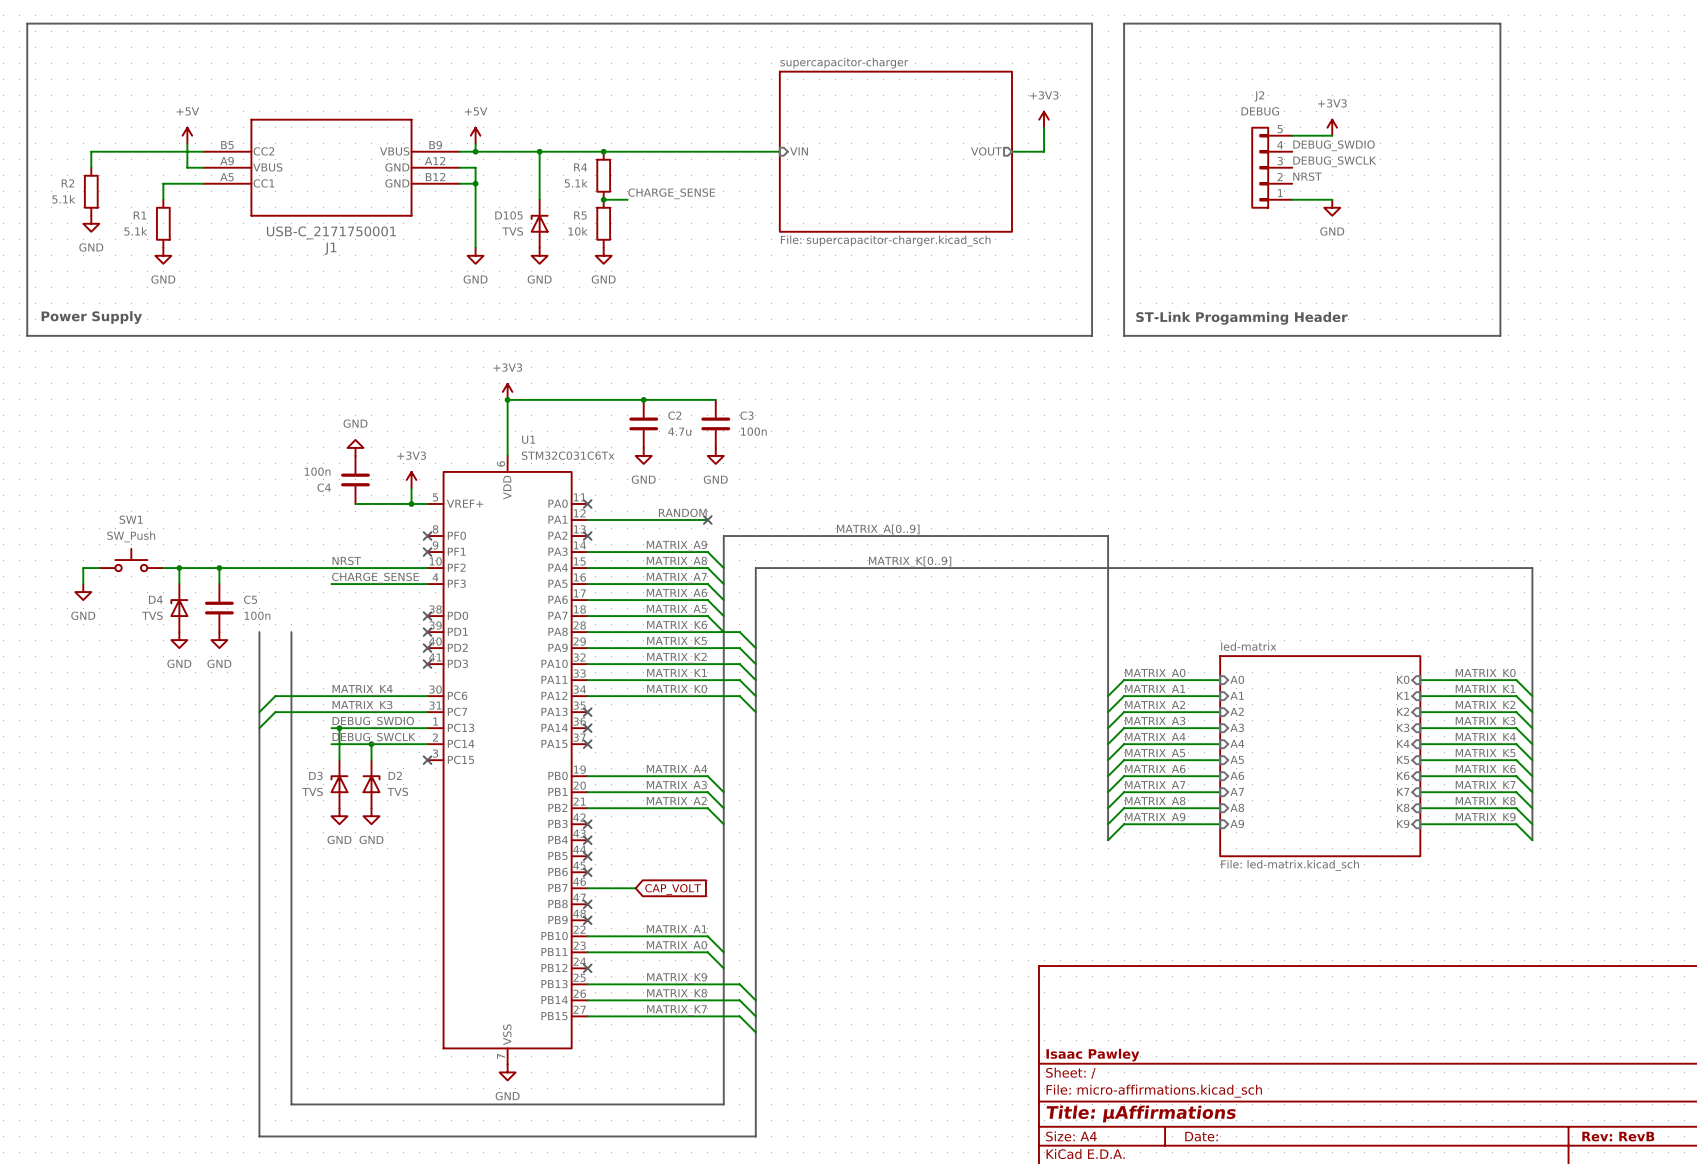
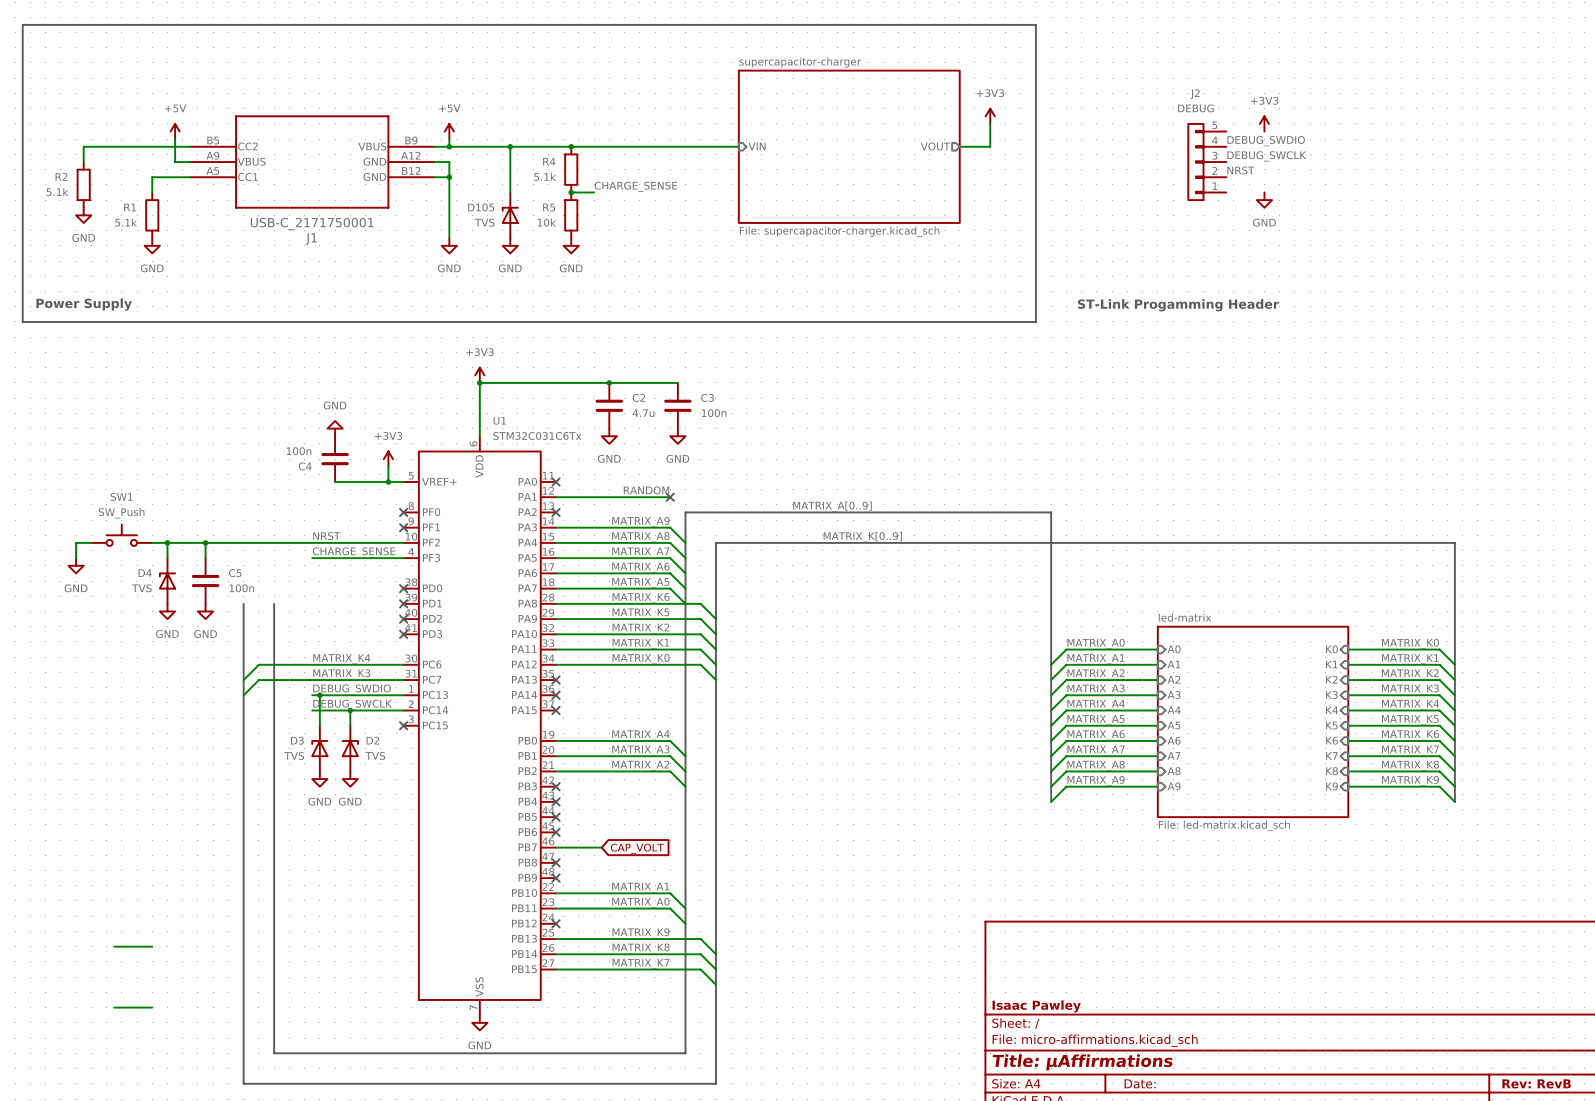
line: (1124, 23) (1500, 23) (1500, 335) (1124, 335) (1124, 23) -> none
wire: (1292, 135) (1332, 135) -> none
wire: (1292, 199) (1332, 199) -> none
wire: none -> (114, 946) (152, 946)
wire: none -> (114, 1007) (152, 1007)

